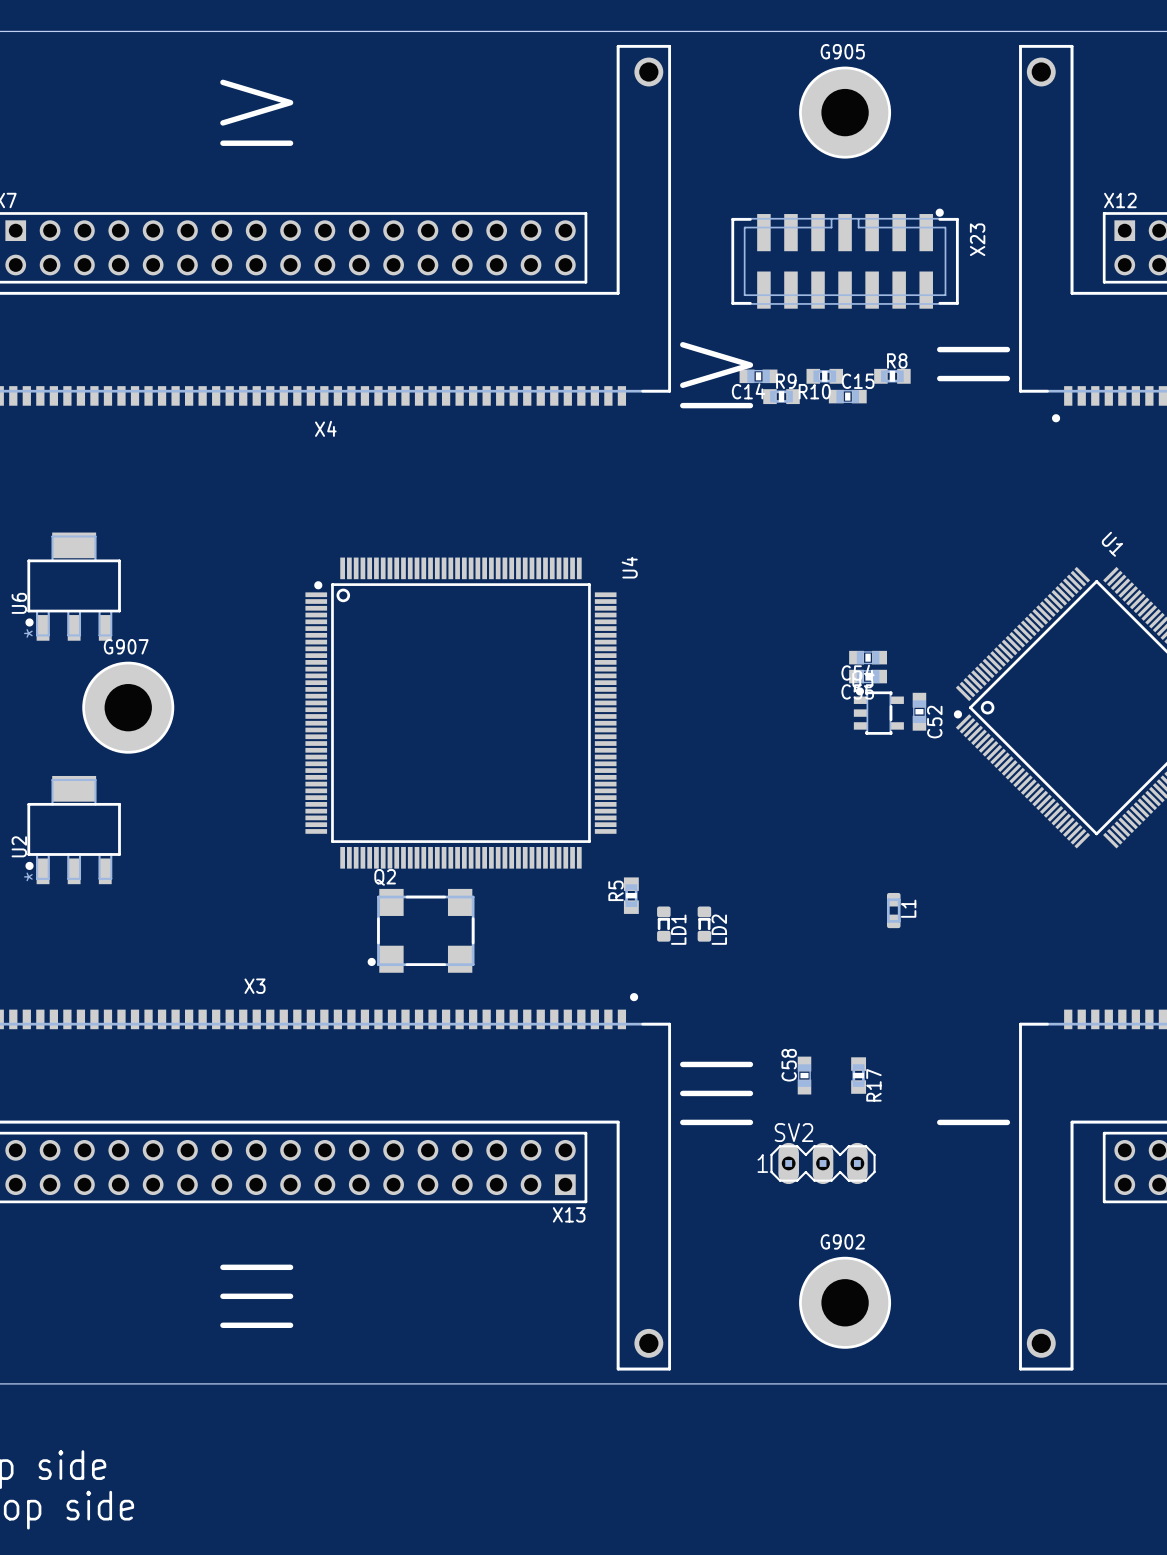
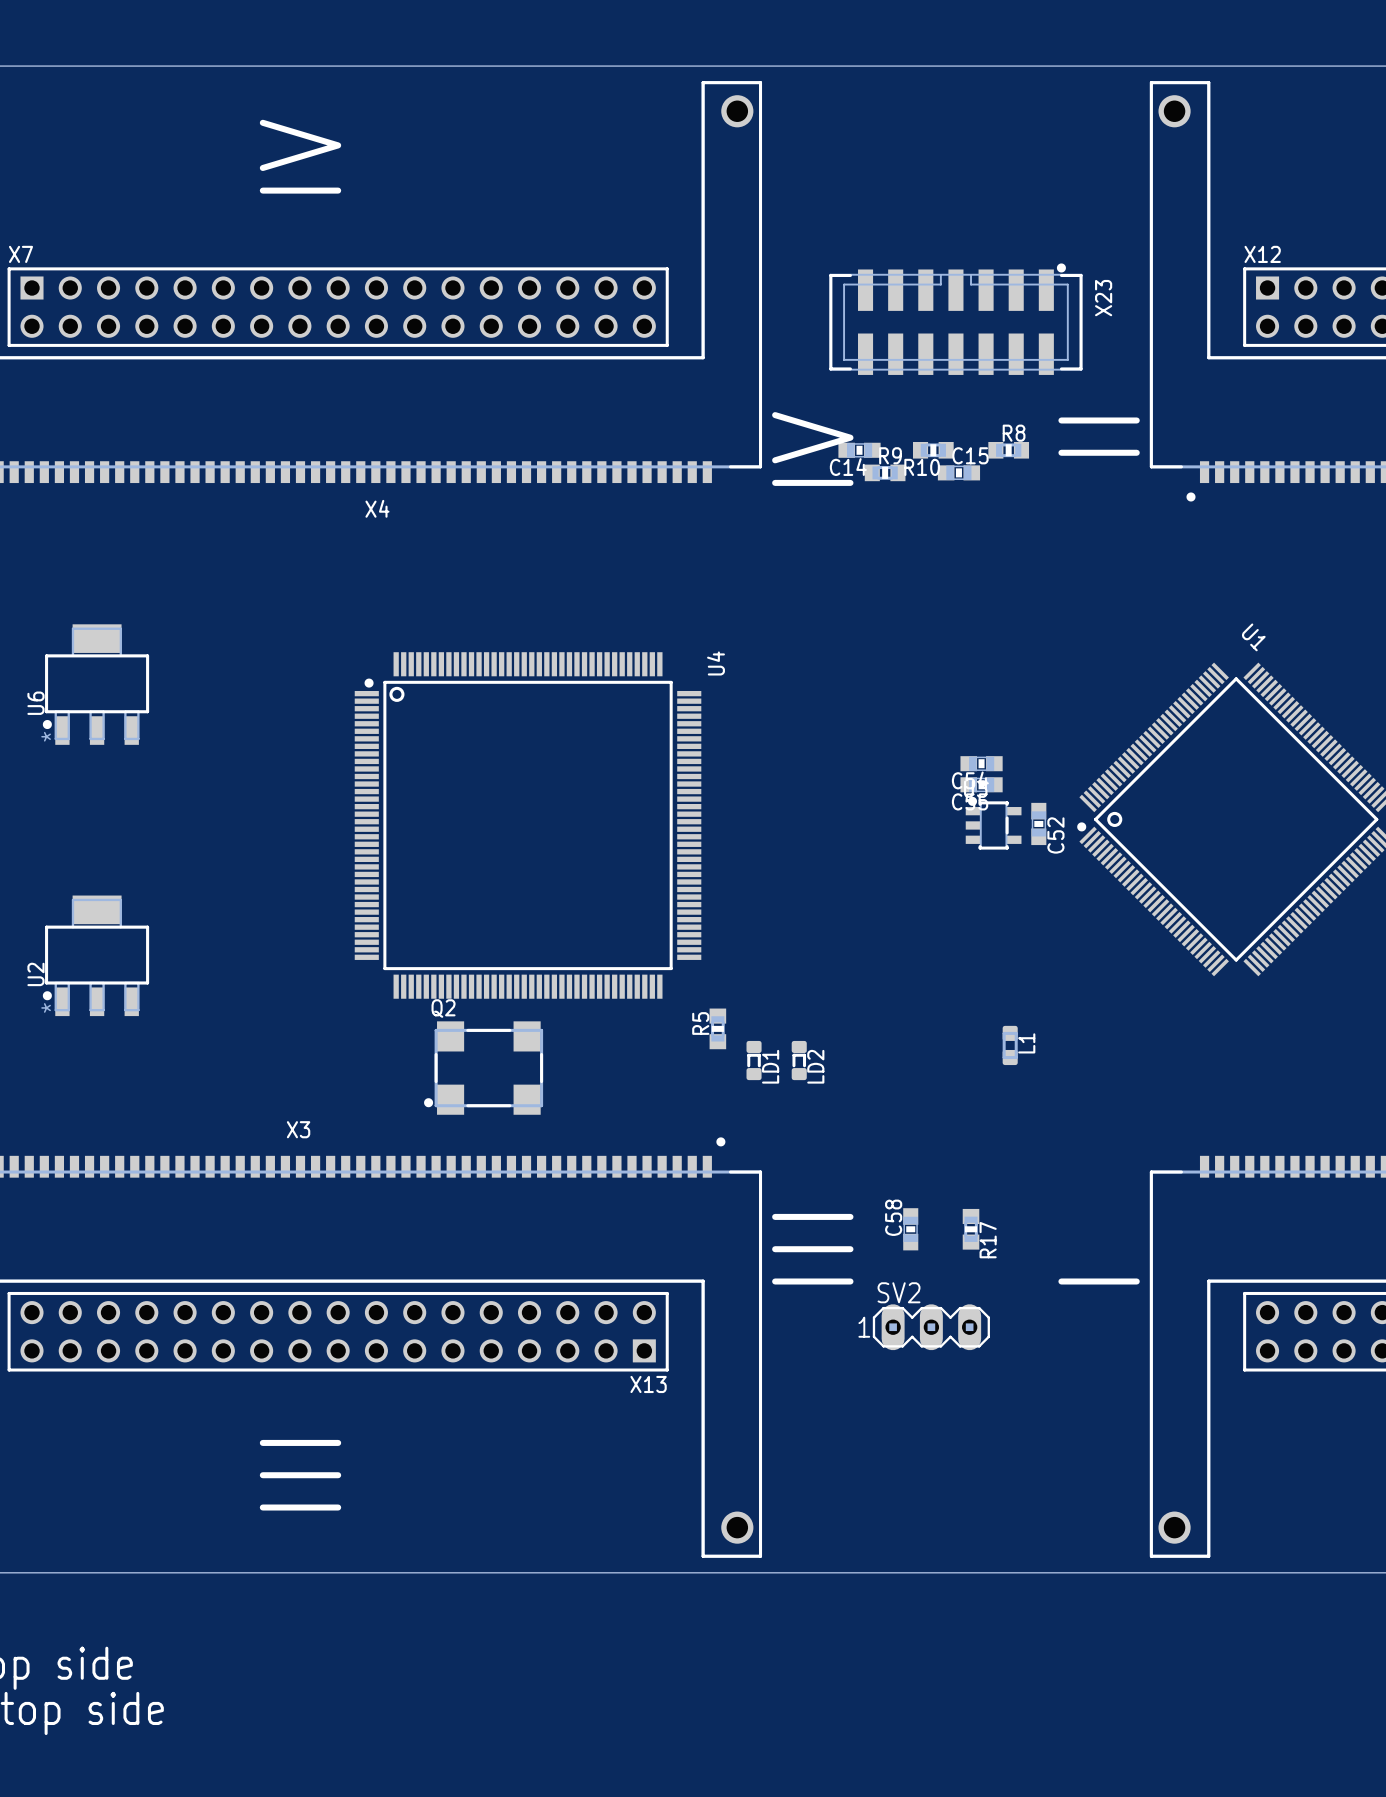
G905: (845, 112) -> none
G907: (128, 707) -> none
G902: (845, 1302) -> none

